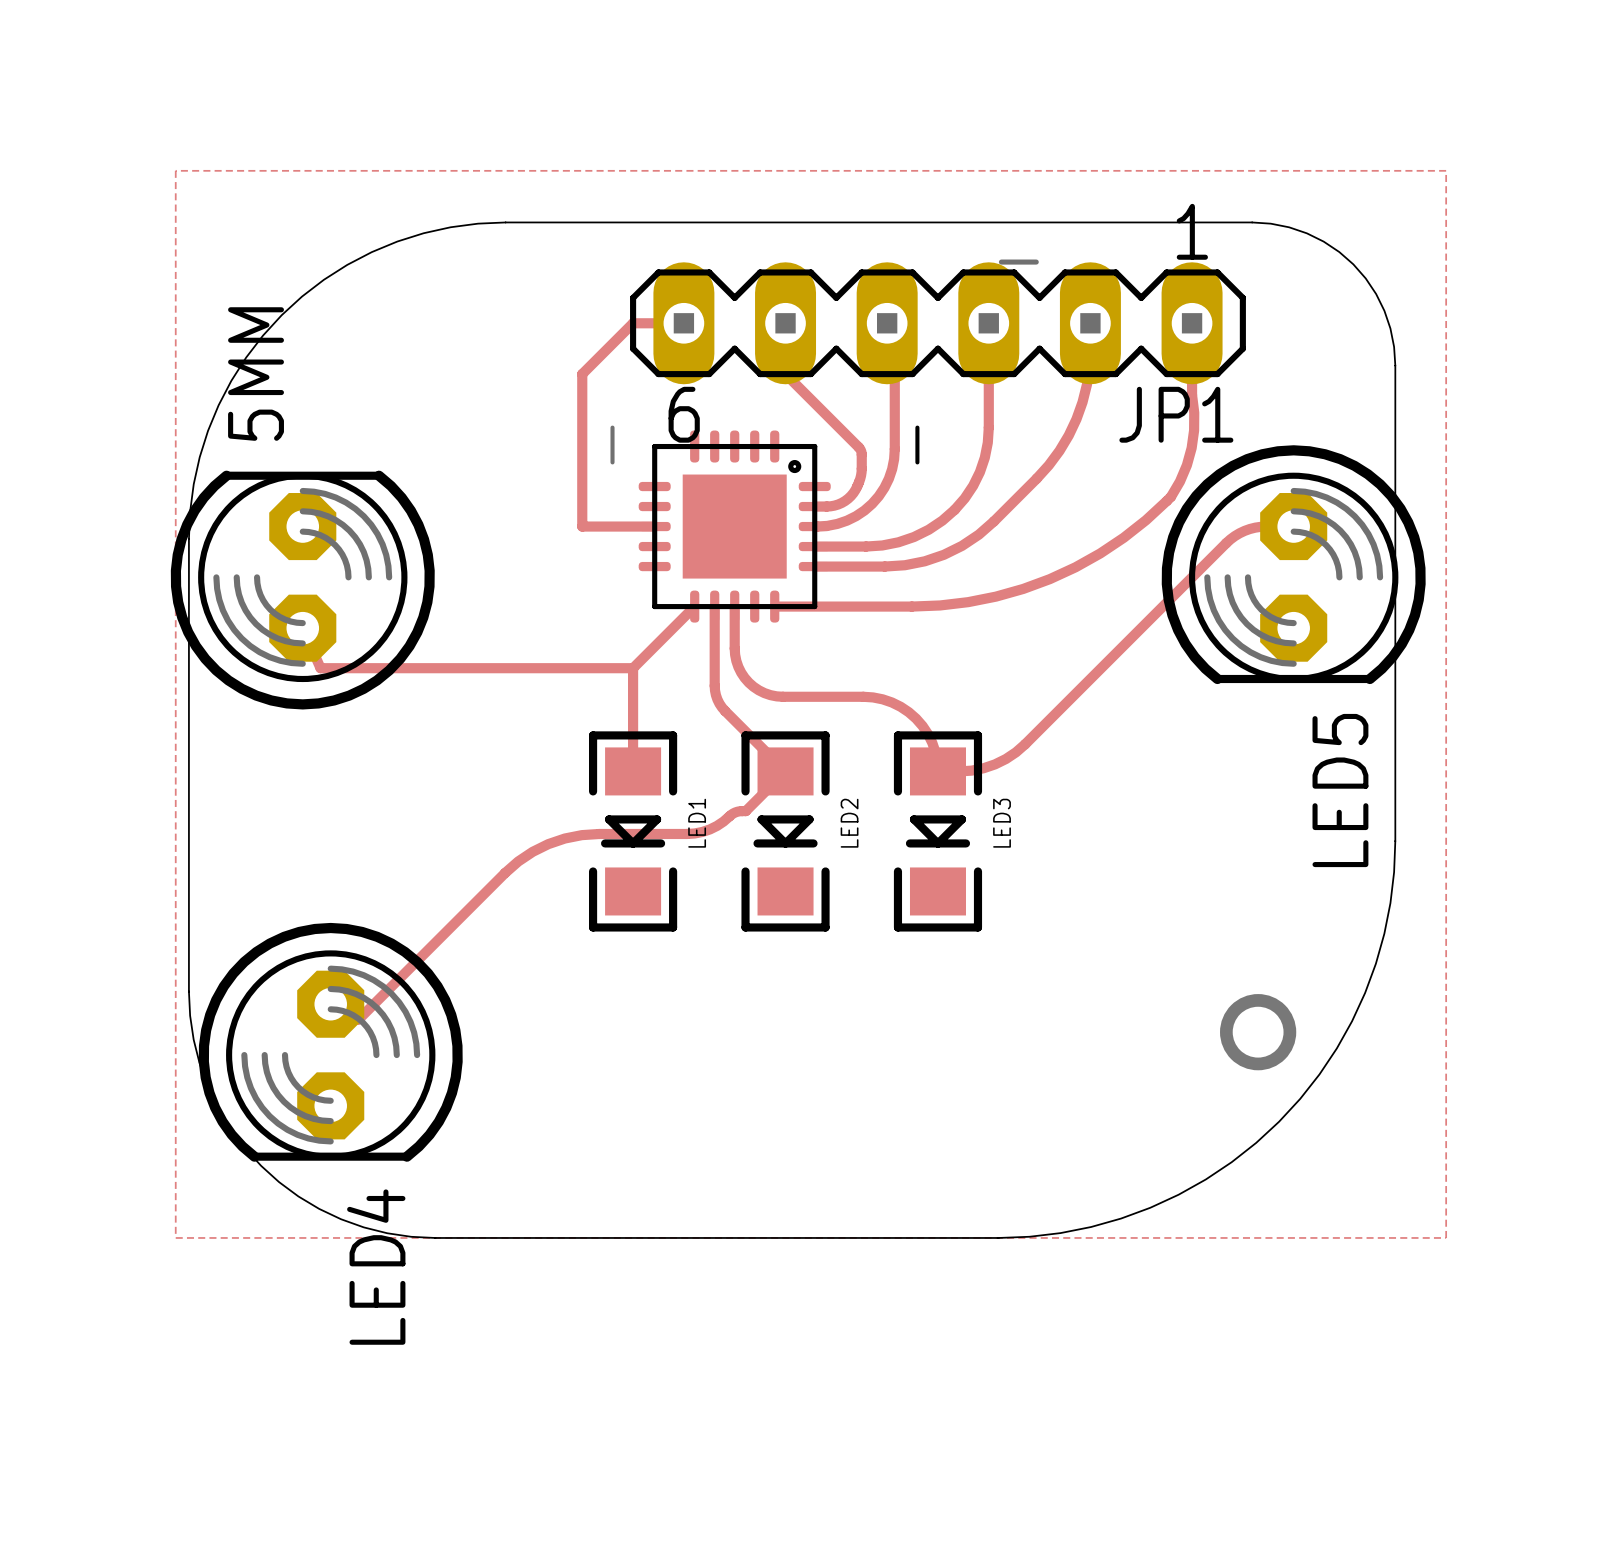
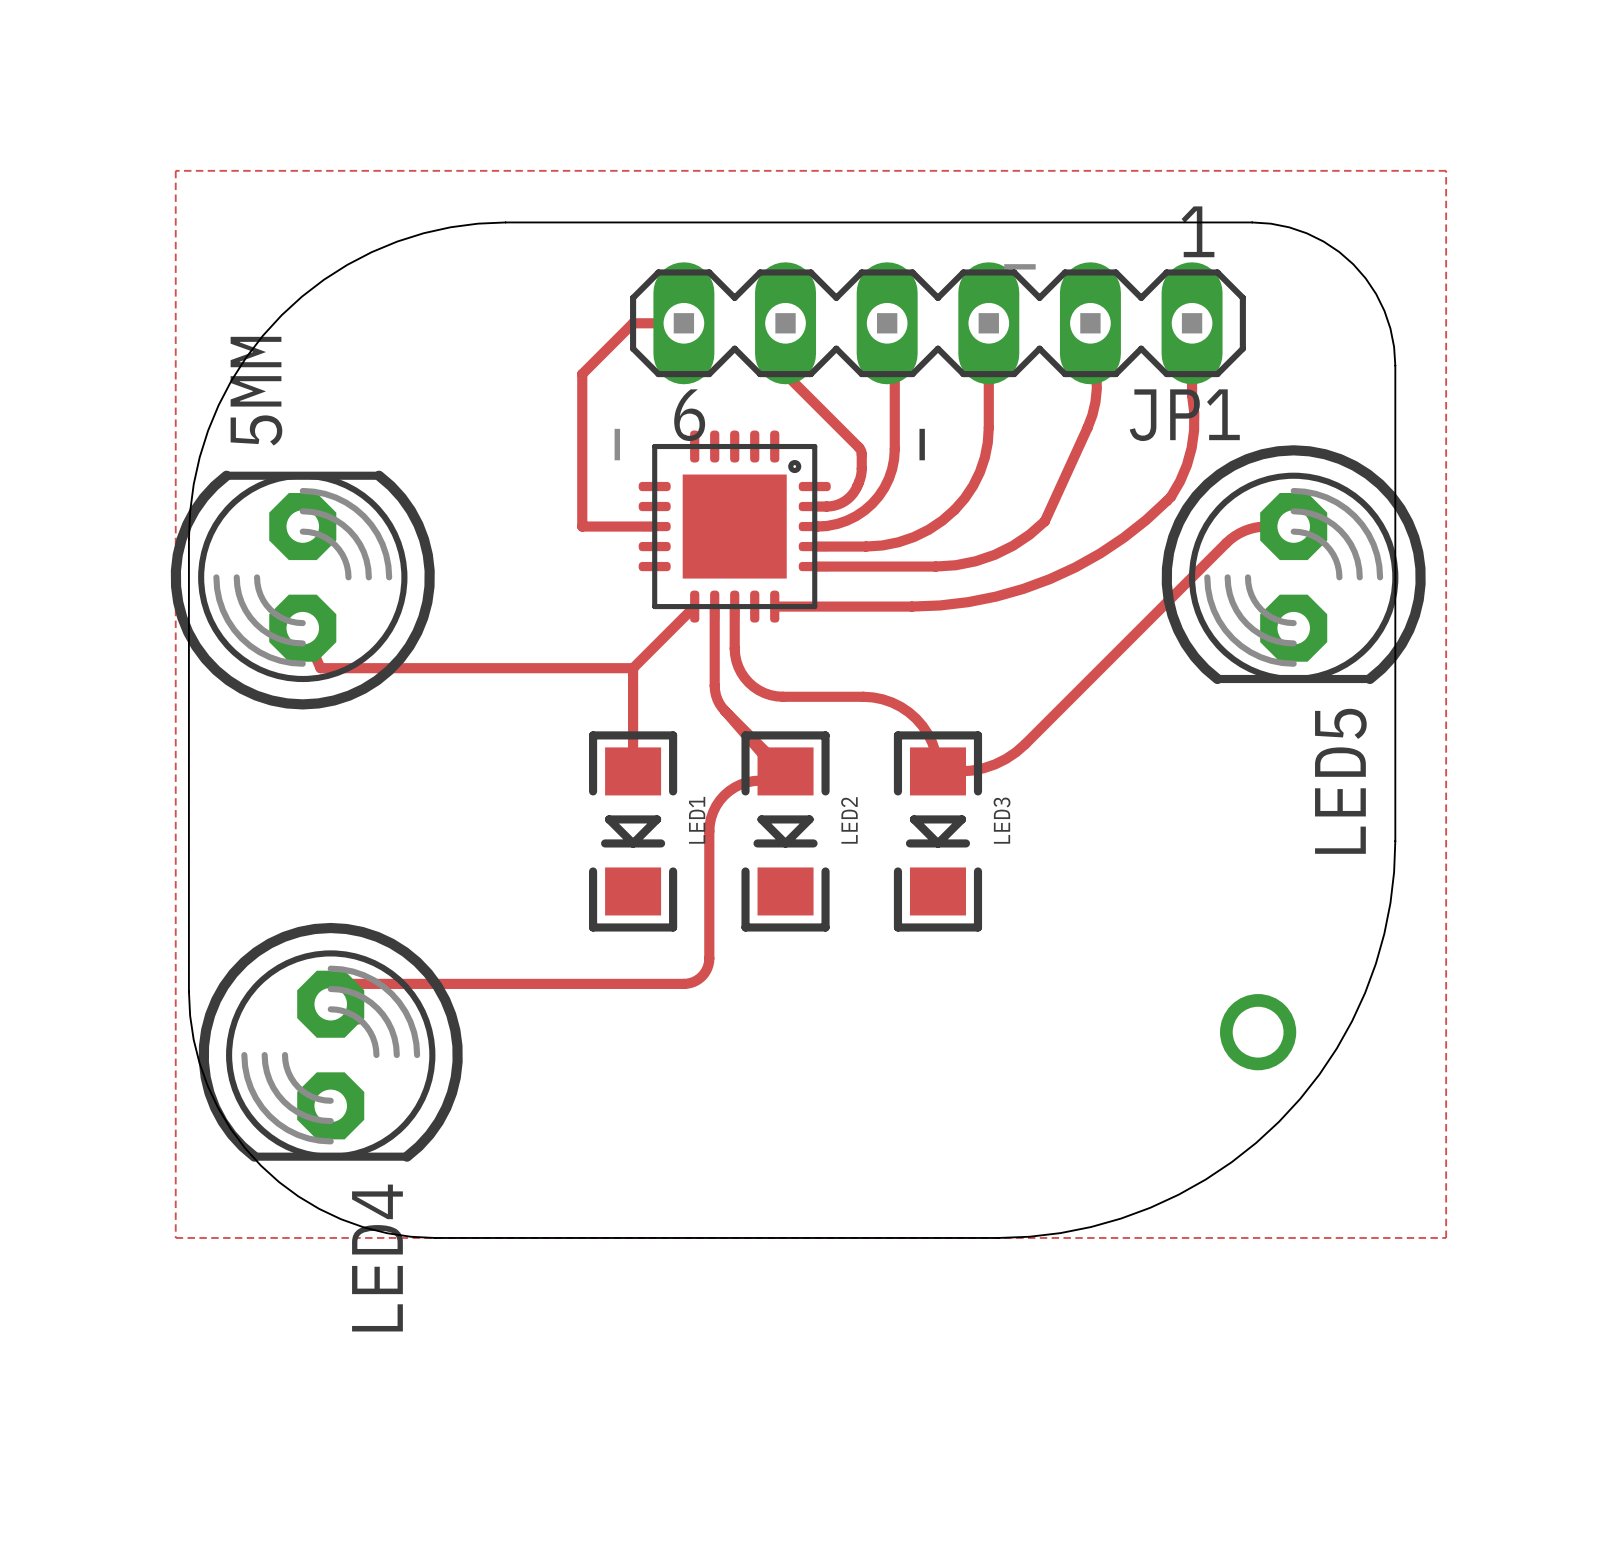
track: (1090, 349) (1086, 384) (1076, 419) (1059, 450) (1036, 478) (994, 521) (962, 545) (924, 561) (884, 566) -> (1090, 349) (1096, 375) (1095, 402) (1092, 415) (1044, 521) (1012, 545) (975, 561) (935, 566) (884, 566)
track: none -> (725, 711) (785, 780) (753, 781) (740, 784) (724, 795) (713, 812) (709, 831) (709, 961) (705, 971) (699, 978) (683, 983) (348, 984) (340, 986) (334, 991) (330, 1004)
track: (785, 771) (745, 811) (735, 812) (717, 825) (702, 831) (686, 833) (581, 835) (548, 844) (532, 851) (505, 872) (358, 1019) -> none

